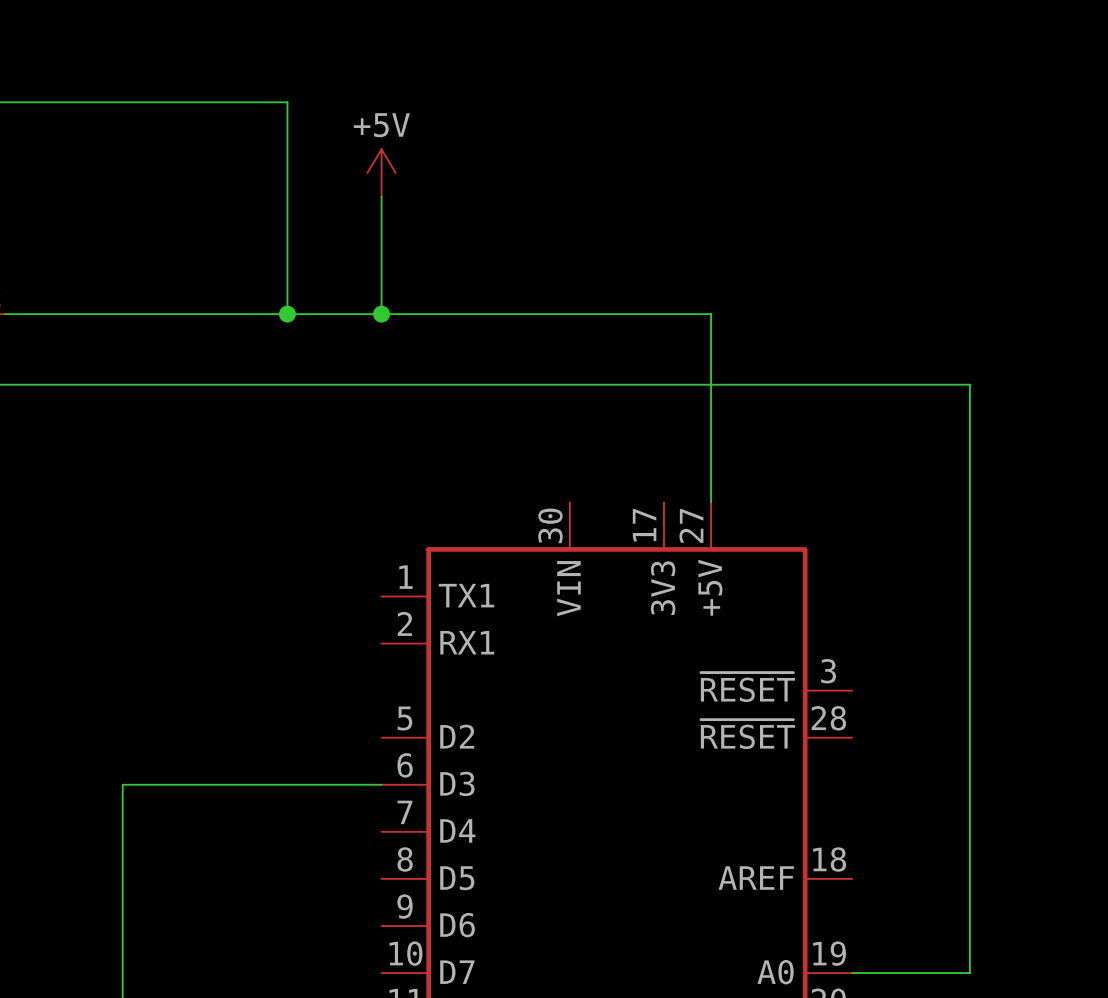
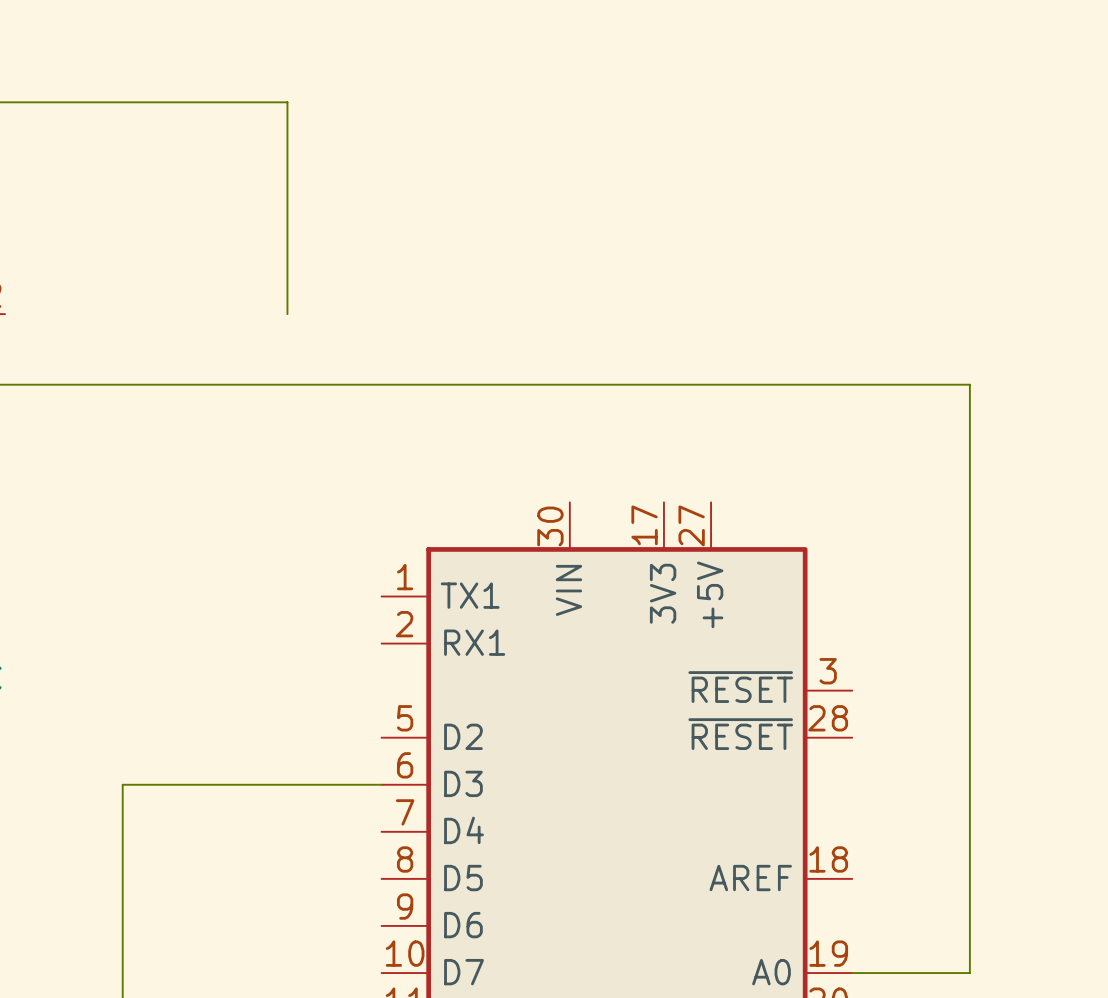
power symbol: +5V (381, 172) -> none
wire: (381, 196) (381, 314) -> none
wire: (5, 314) (711, 314) (711, 502) -> none
junction: (287, 314) -> none
junction: (381, 314) -> none

